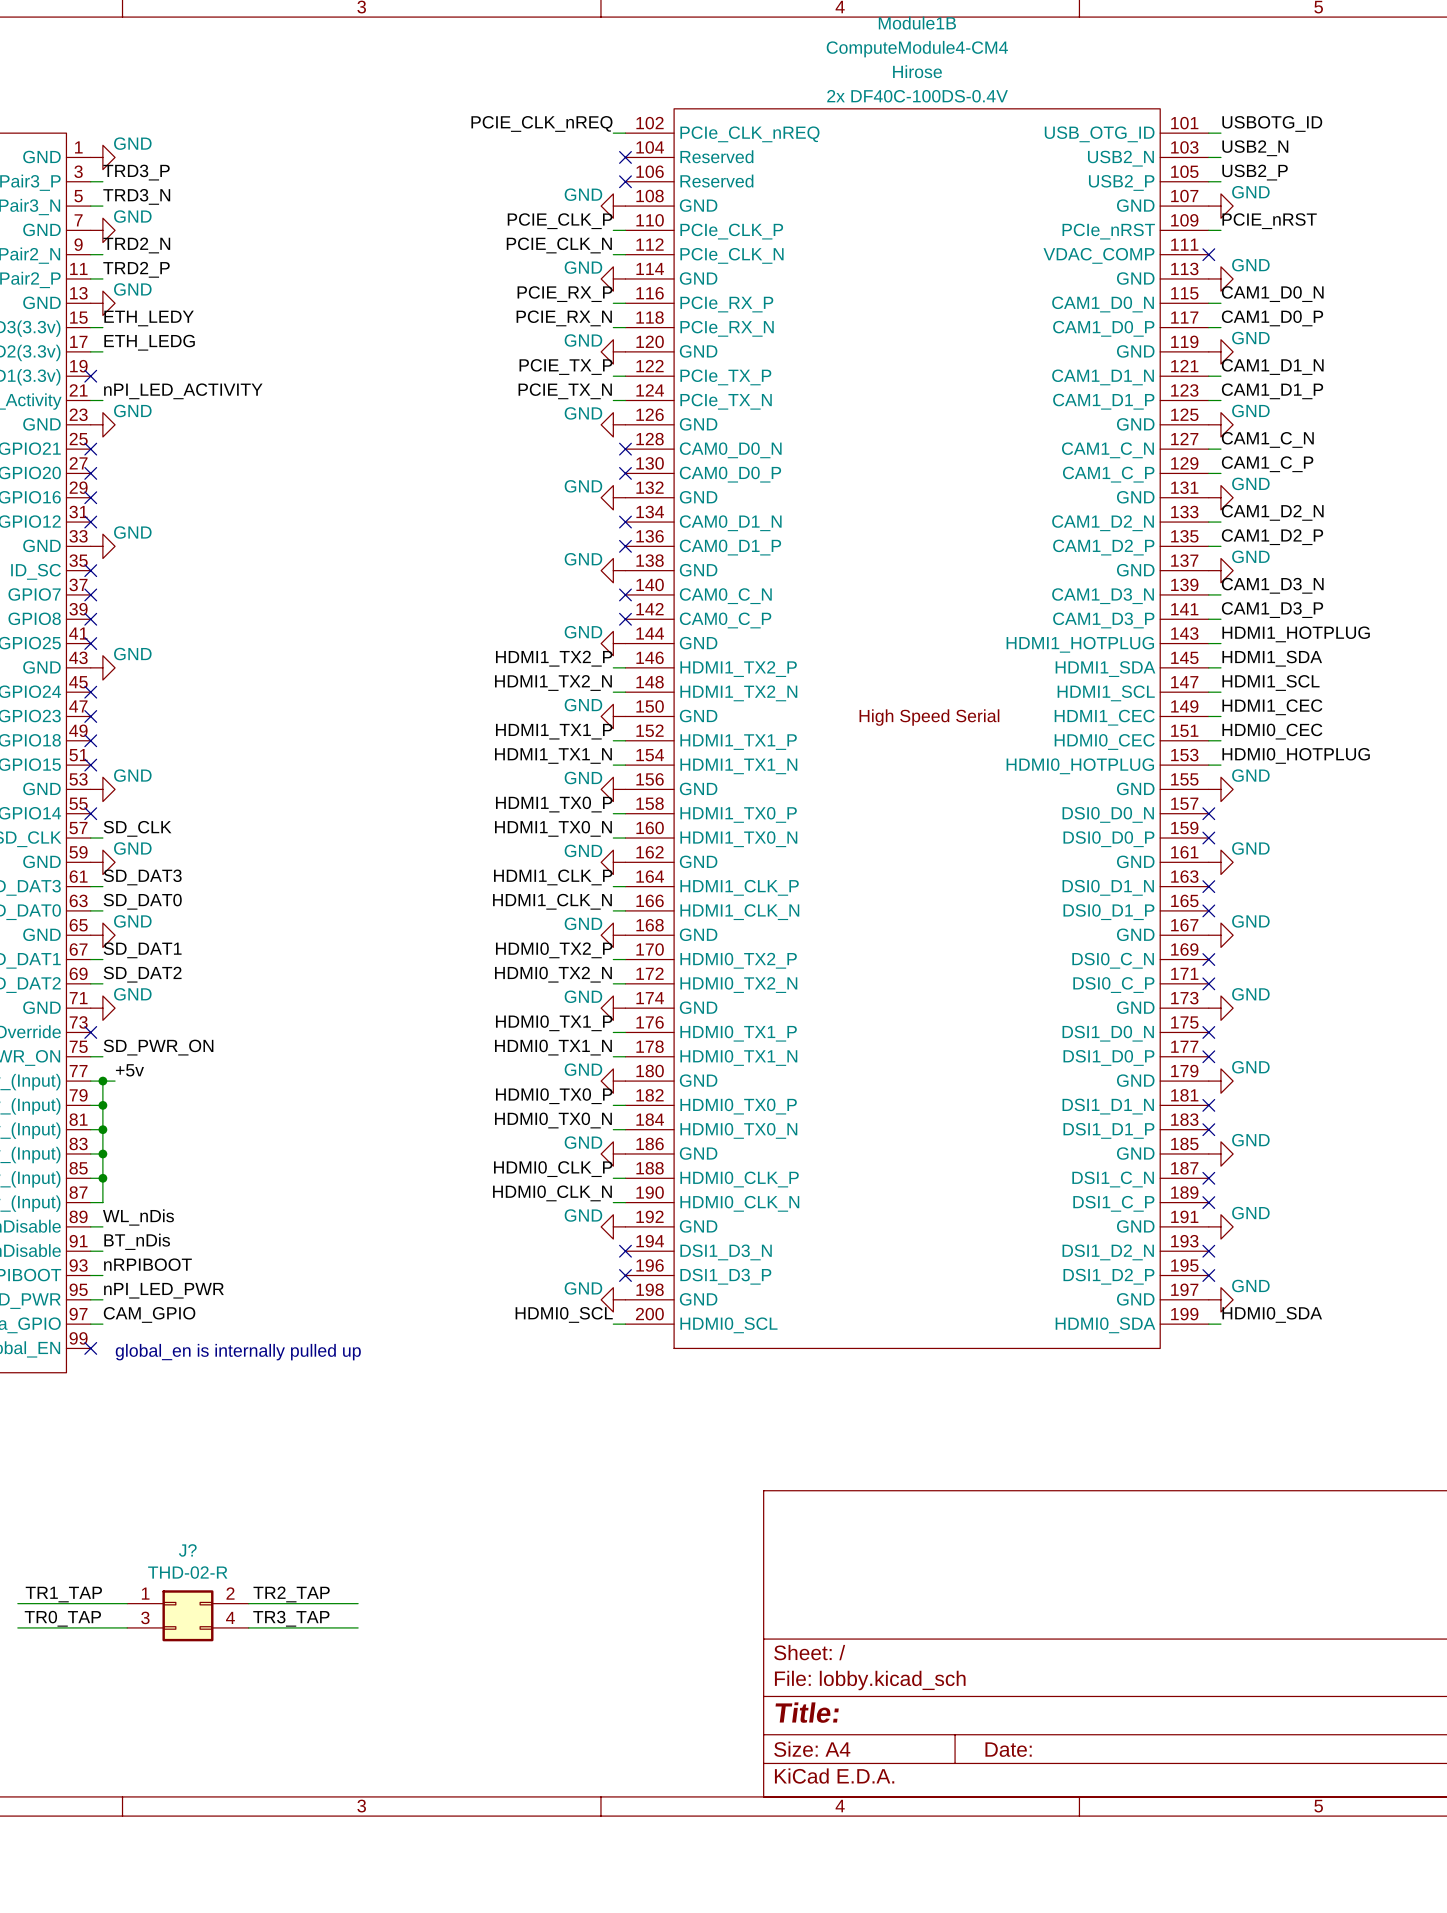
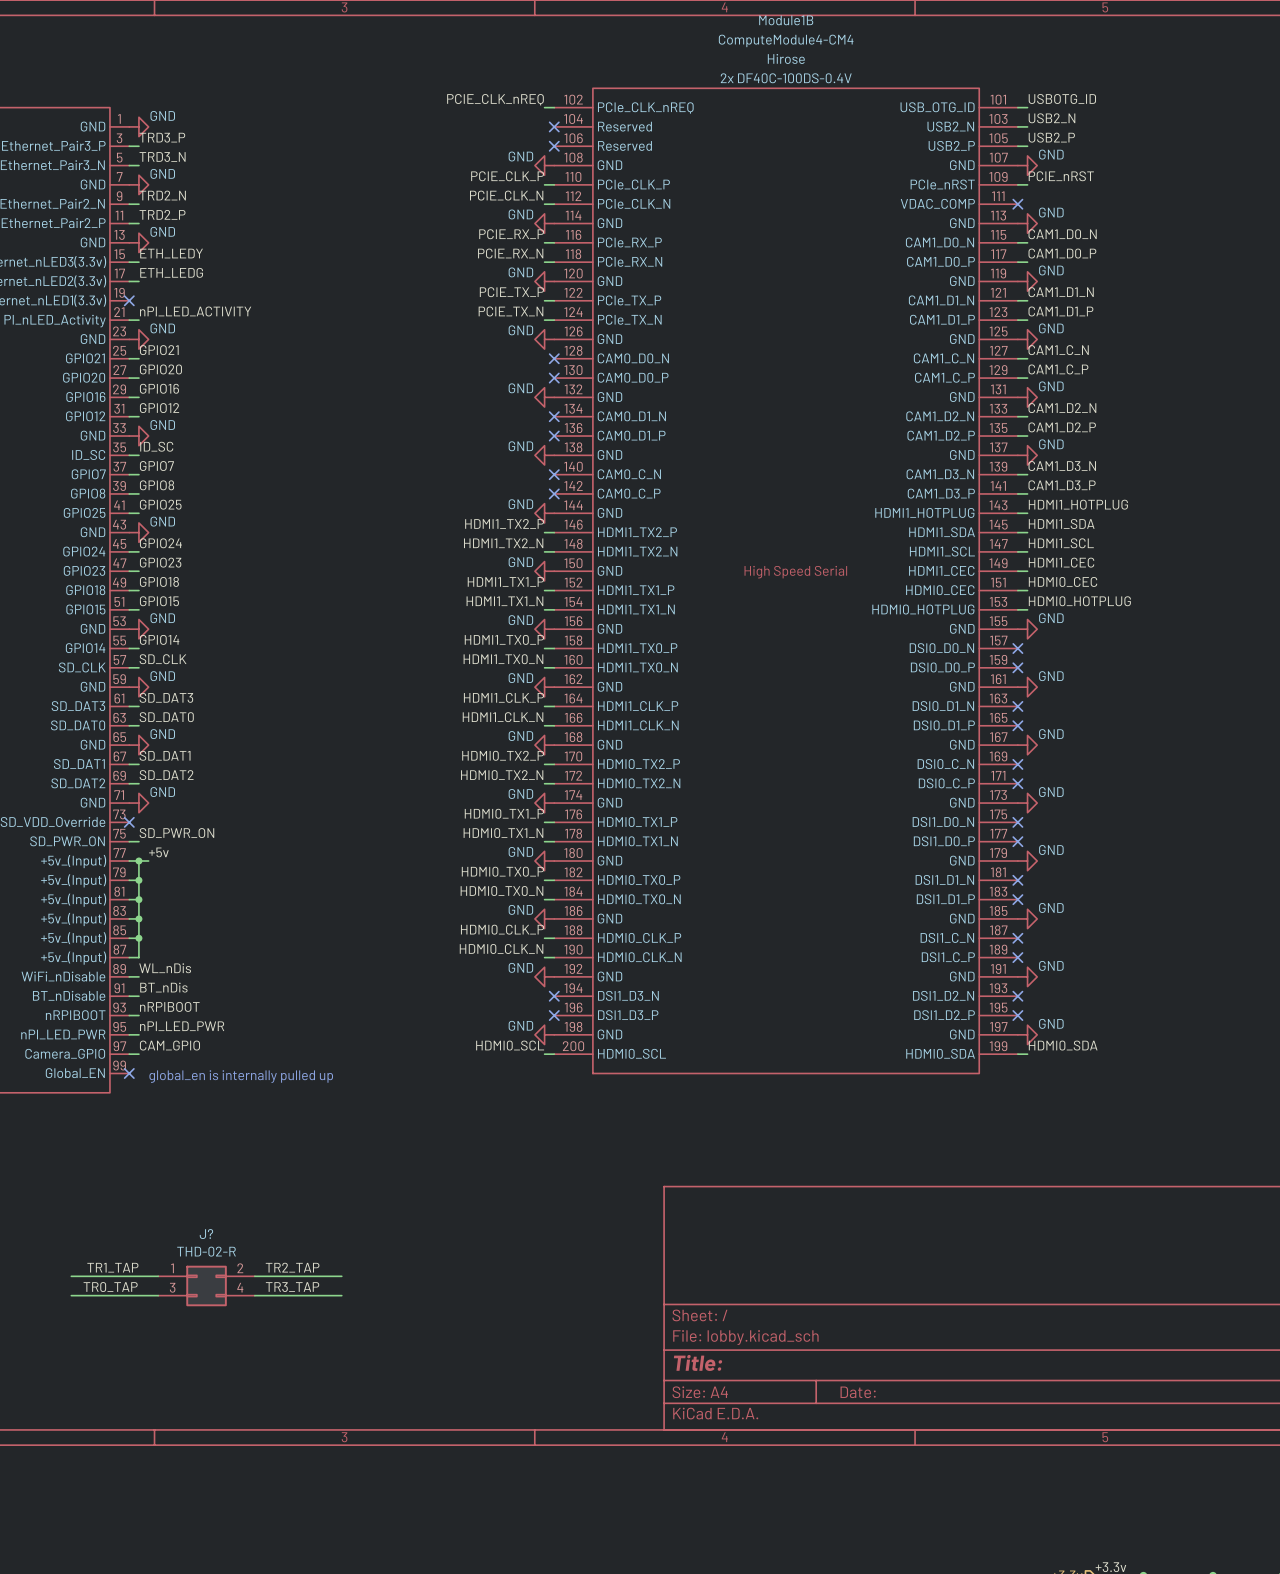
label: none -> GPIO21 (159, 350)
wire: none -> (129, 358) (138, 358)
no-connect mark: (90, 449) -> none
label: none -> GPIO20 (160, 369)
wire: none -> (129, 378) (138, 378)
no-connect mark: (90, 473) -> none
label: none -> GPIO16 (159, 388)
wire: none -> (129, 397) (138, 397)
no-connect mark: (90, 497) -> none
label: none -> GPIO12 (159, 408)
wire: none -> (129, 416) (138, 416)
no-connect mark: (90, 522) -> none
label: none -> ID_SC (156, 446)
wire: none -> (129, 455) (138, 455)
no-connect mark: (90, 570) -> none
label: none -> GPIO7 (156, 466)
wire: none -> (129, 474) (138, 474)
no-connect mark: (90, 594) -> none
label: none -> GPIO8 (157, 485)
wire: none -> (129, 493) (138, 493)
no-connect mark: (90, 619) -> none
label: none -> GPIO25 (160, 504)
wire: none -> (129, 513) (138, 513)
no-connect mark: (90, 643) -> none
label: none -> GPIO24 (160, 543)
wire: none -> (129, 551) (138, 551)
no-connect mark: (90, 692) -> none
label: none -> GPIO23 (160, 562)
wire: none -> (129, 571) (138, 571)
no-connect mark: (90, 716) -> none
label: none -> GPIO18 (159, 581)
wire: none -> (129, 590) (138, 590)
no-connect mark: (90, 740) -> none
label: none -> GPIO15 (159, 601)
wire: none -> (129, 609) (138, 609)
no-connect mark: (90, 765) -> none
label: none -> GPIO14 (159, 639)
wire: none -> (129, 648) (138, 648)
no-connect mark: (90, 813) -> none

